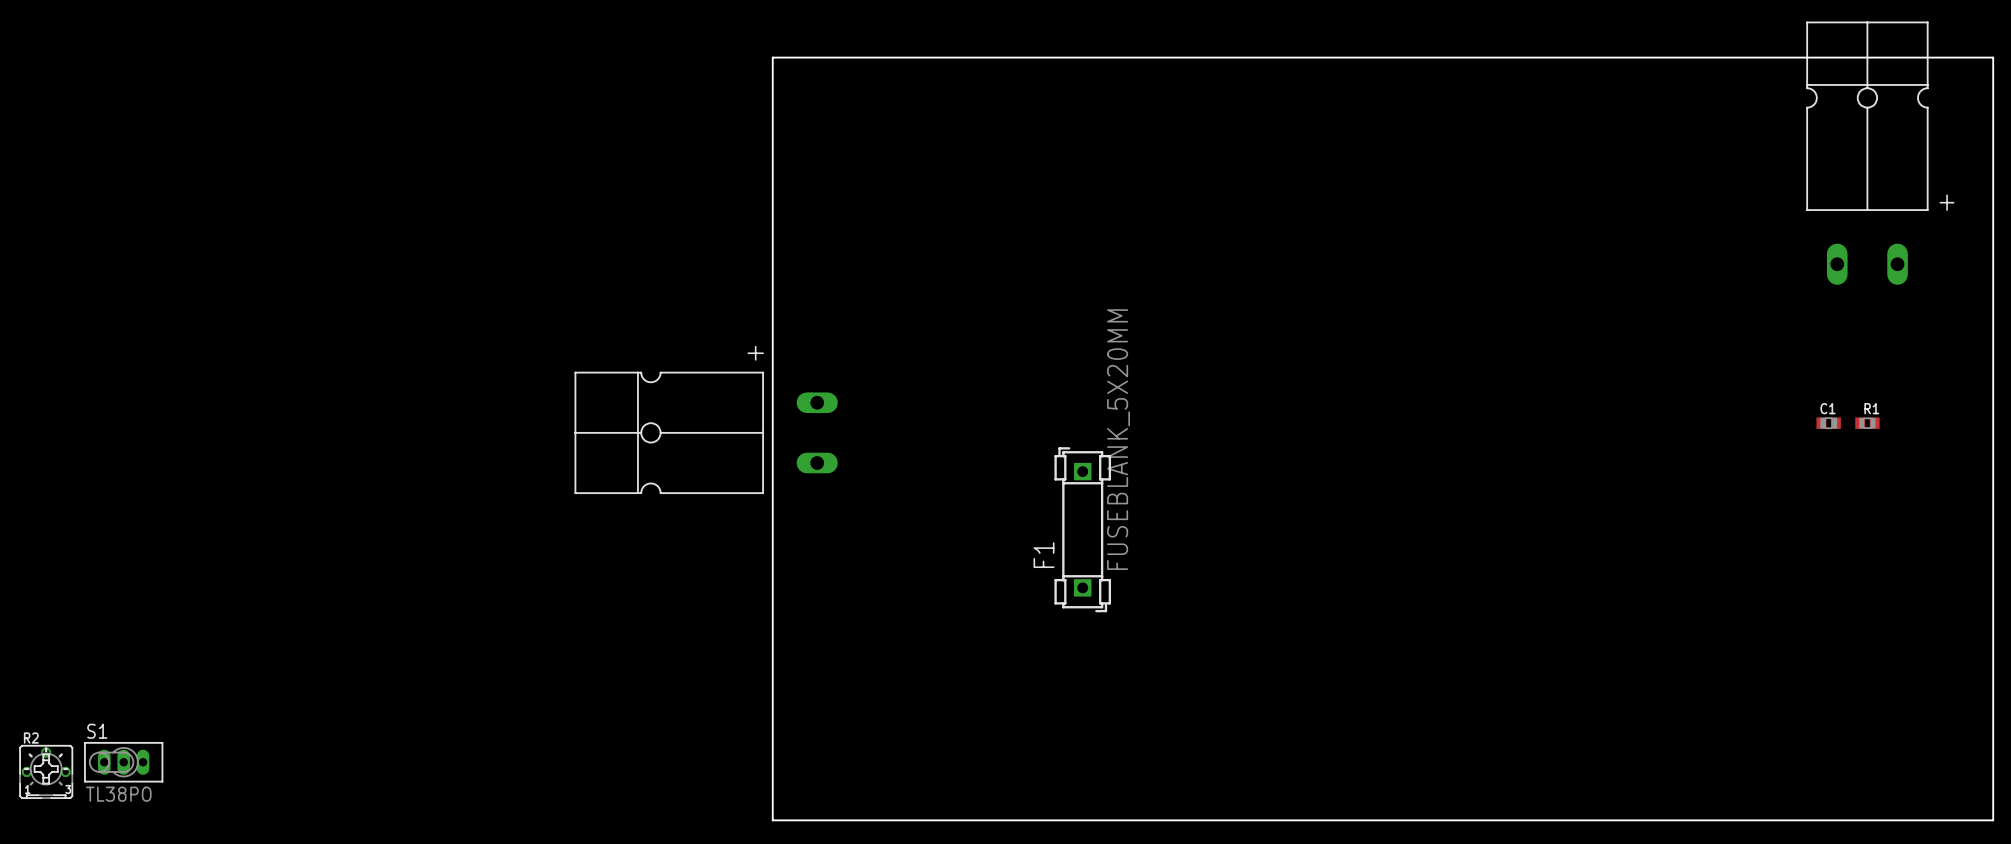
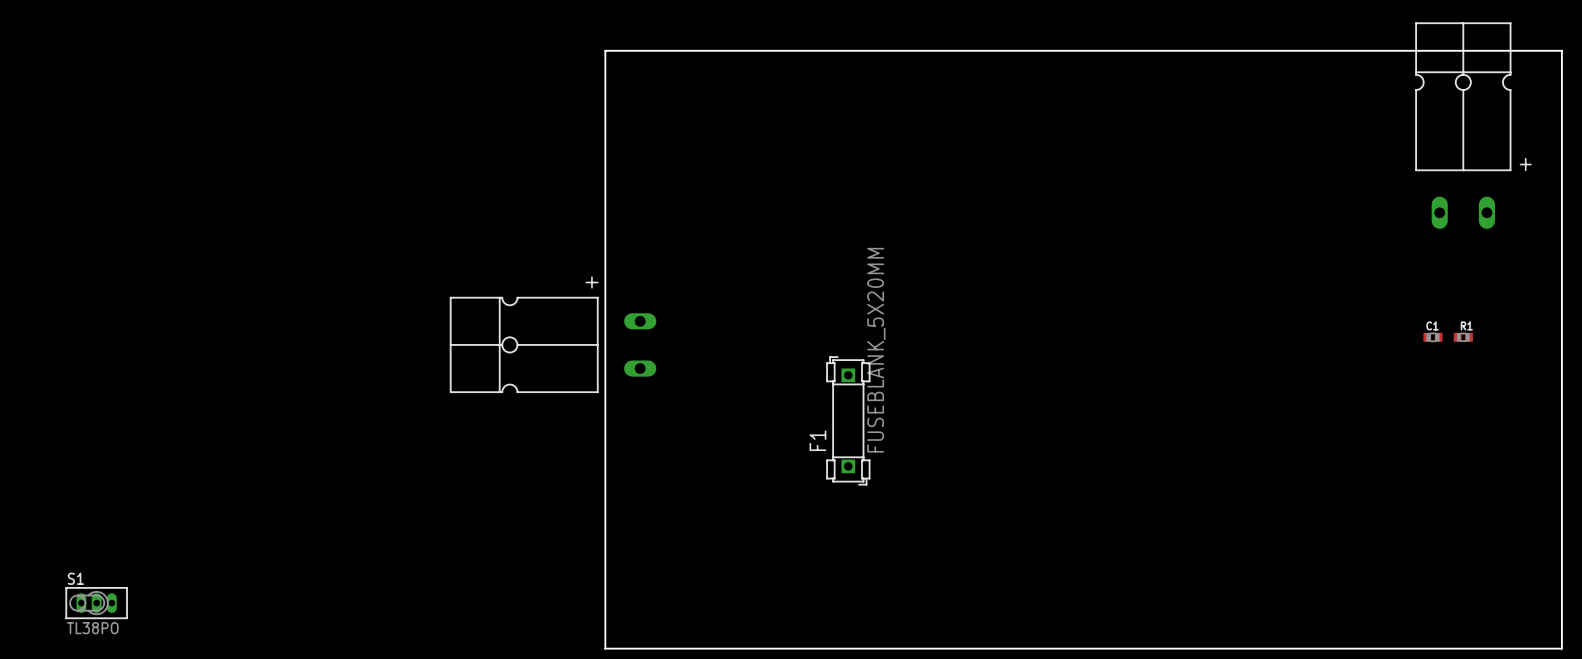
R2: (46, 771) -> none

